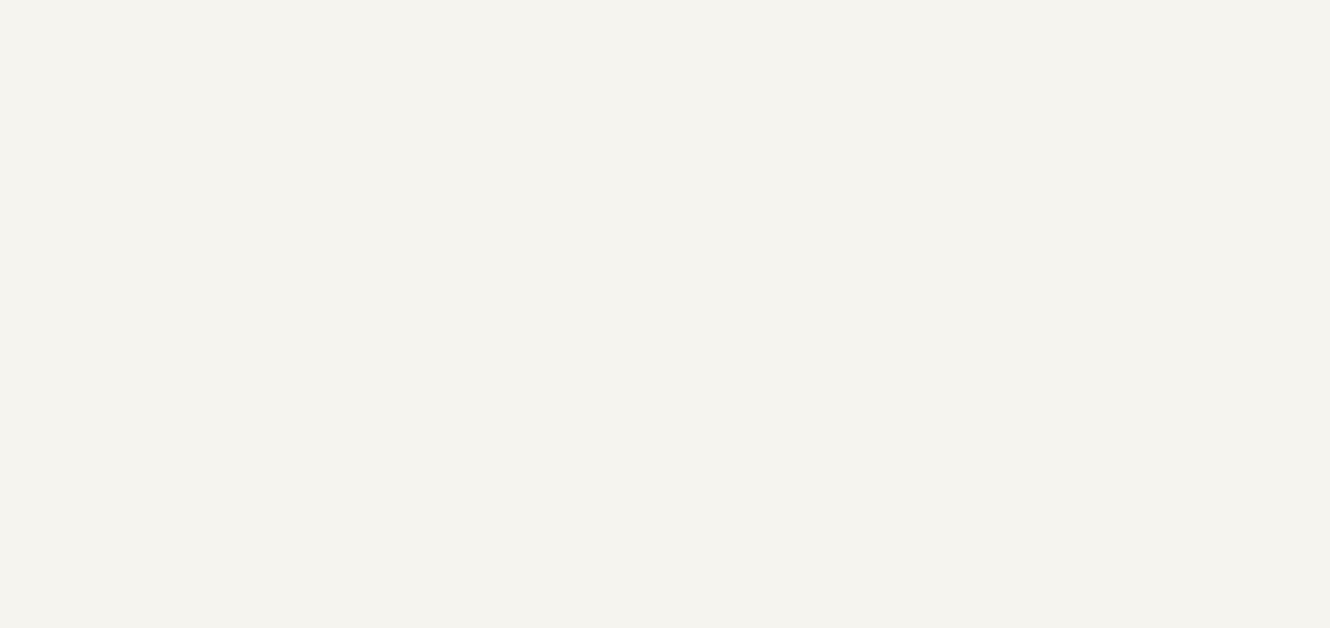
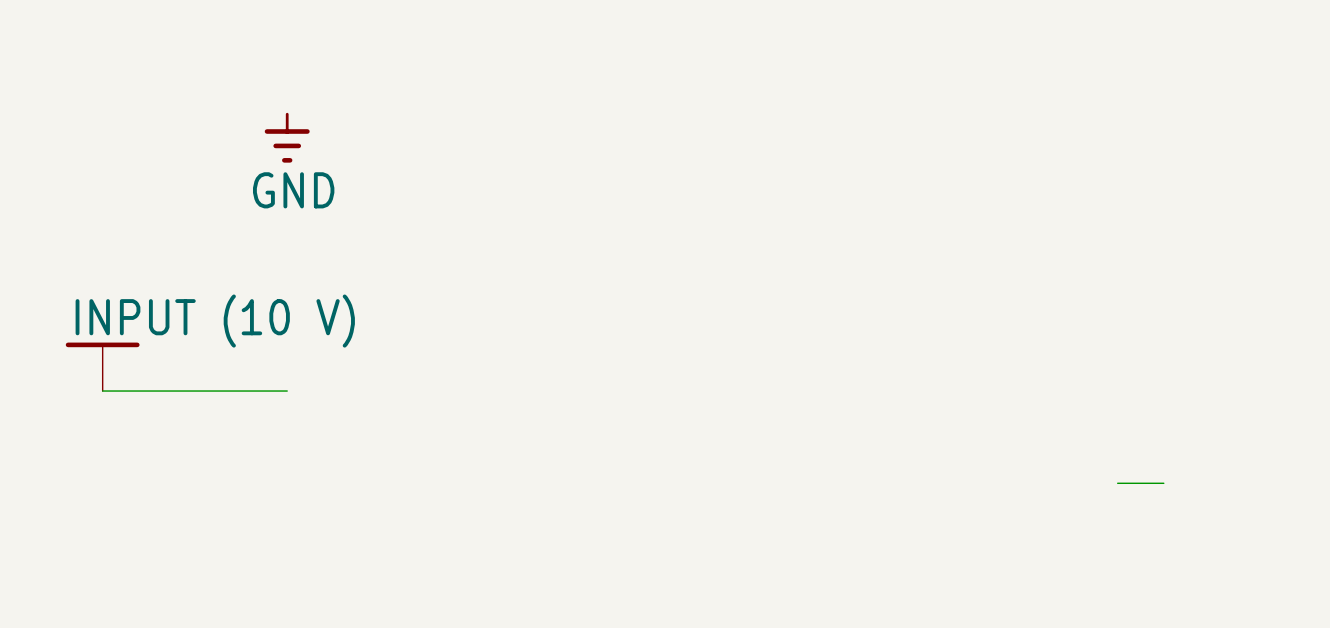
power symbol: none -> GND (287, 137)
power symbol: none -> INPUT (10 V) (102, 366)
wire: none -> (102, 391) (287, 391)
wire: none -> (1117, 483) (1163, 483)

